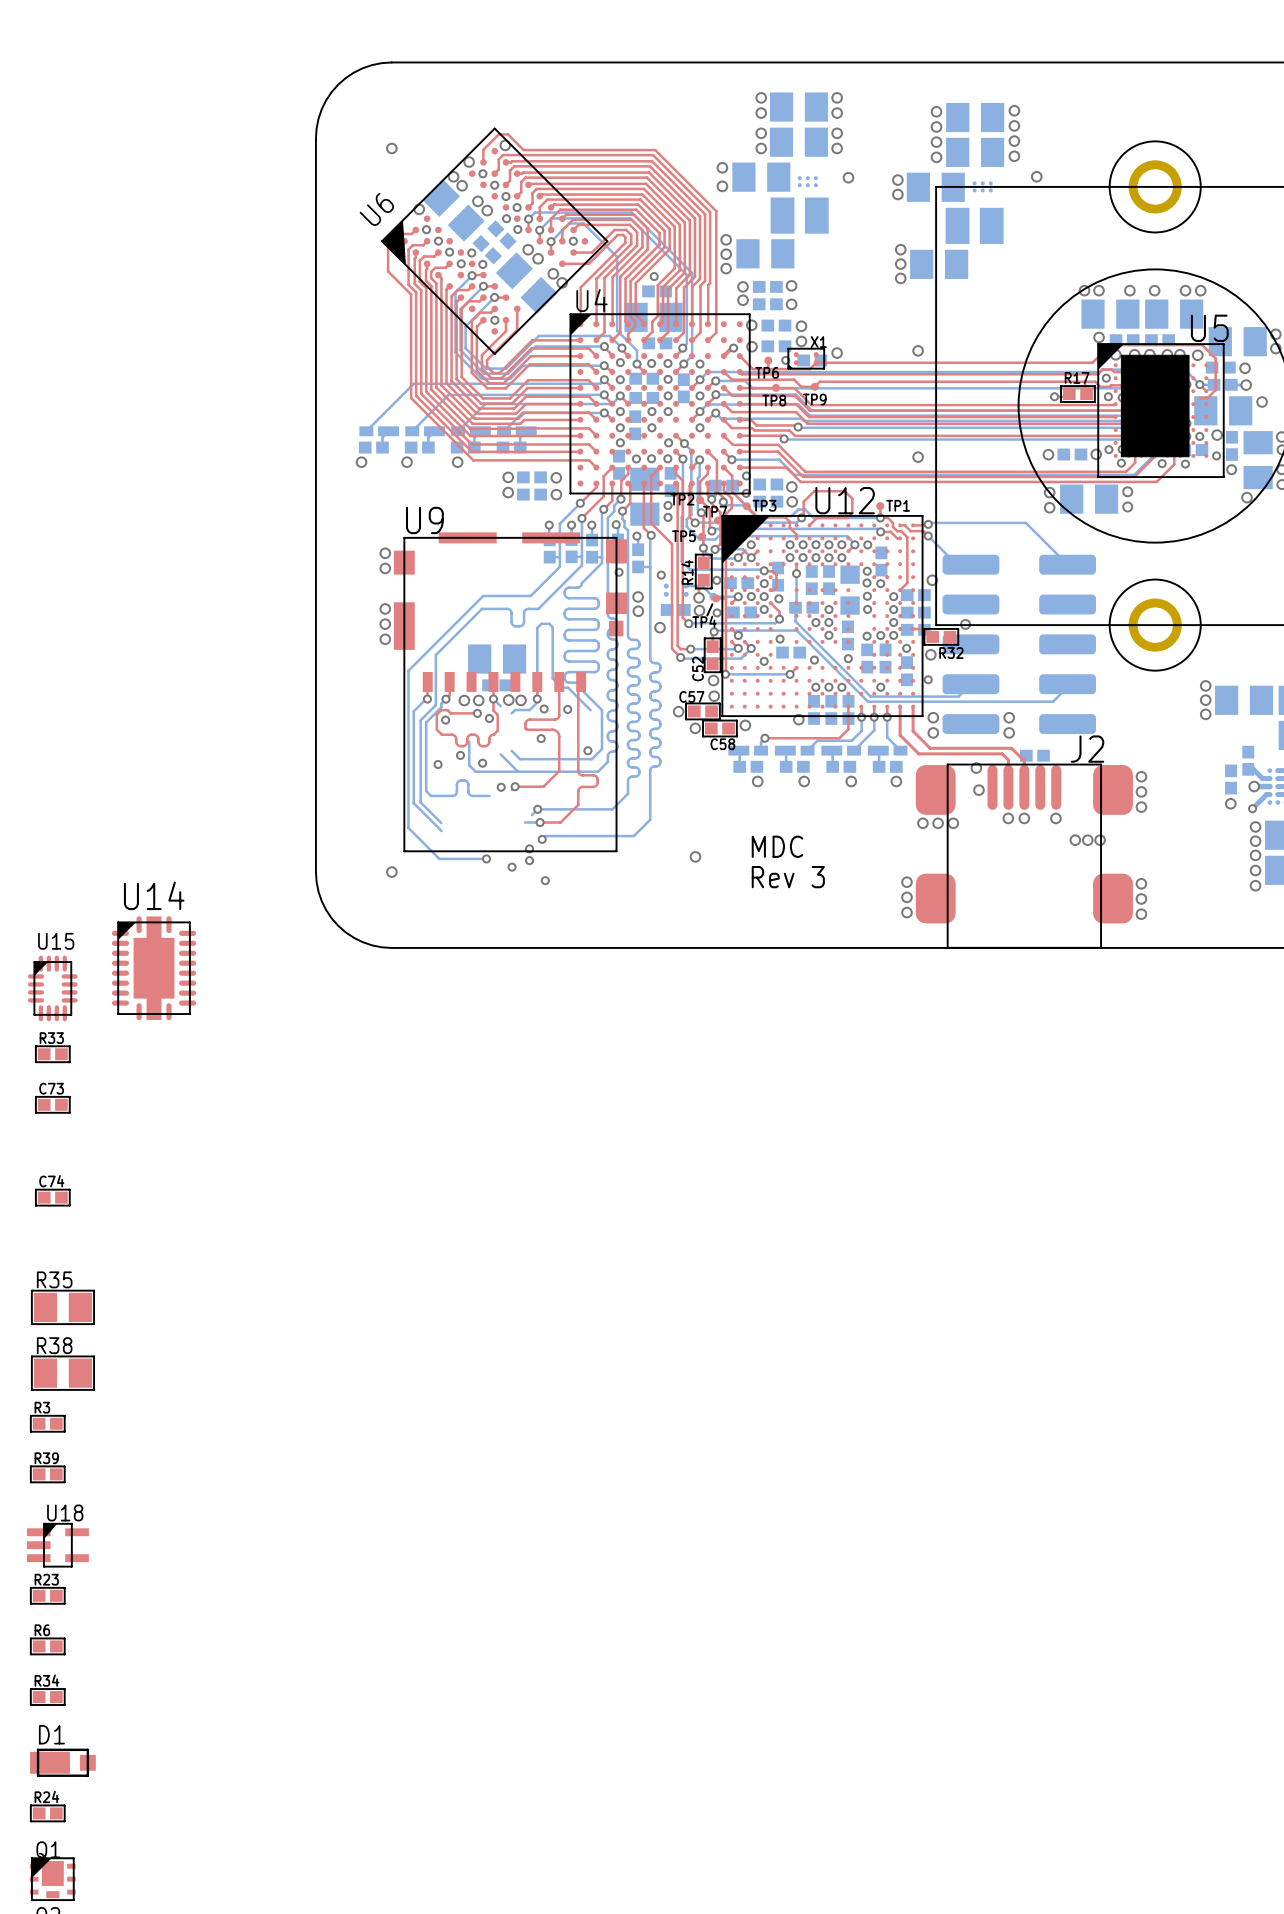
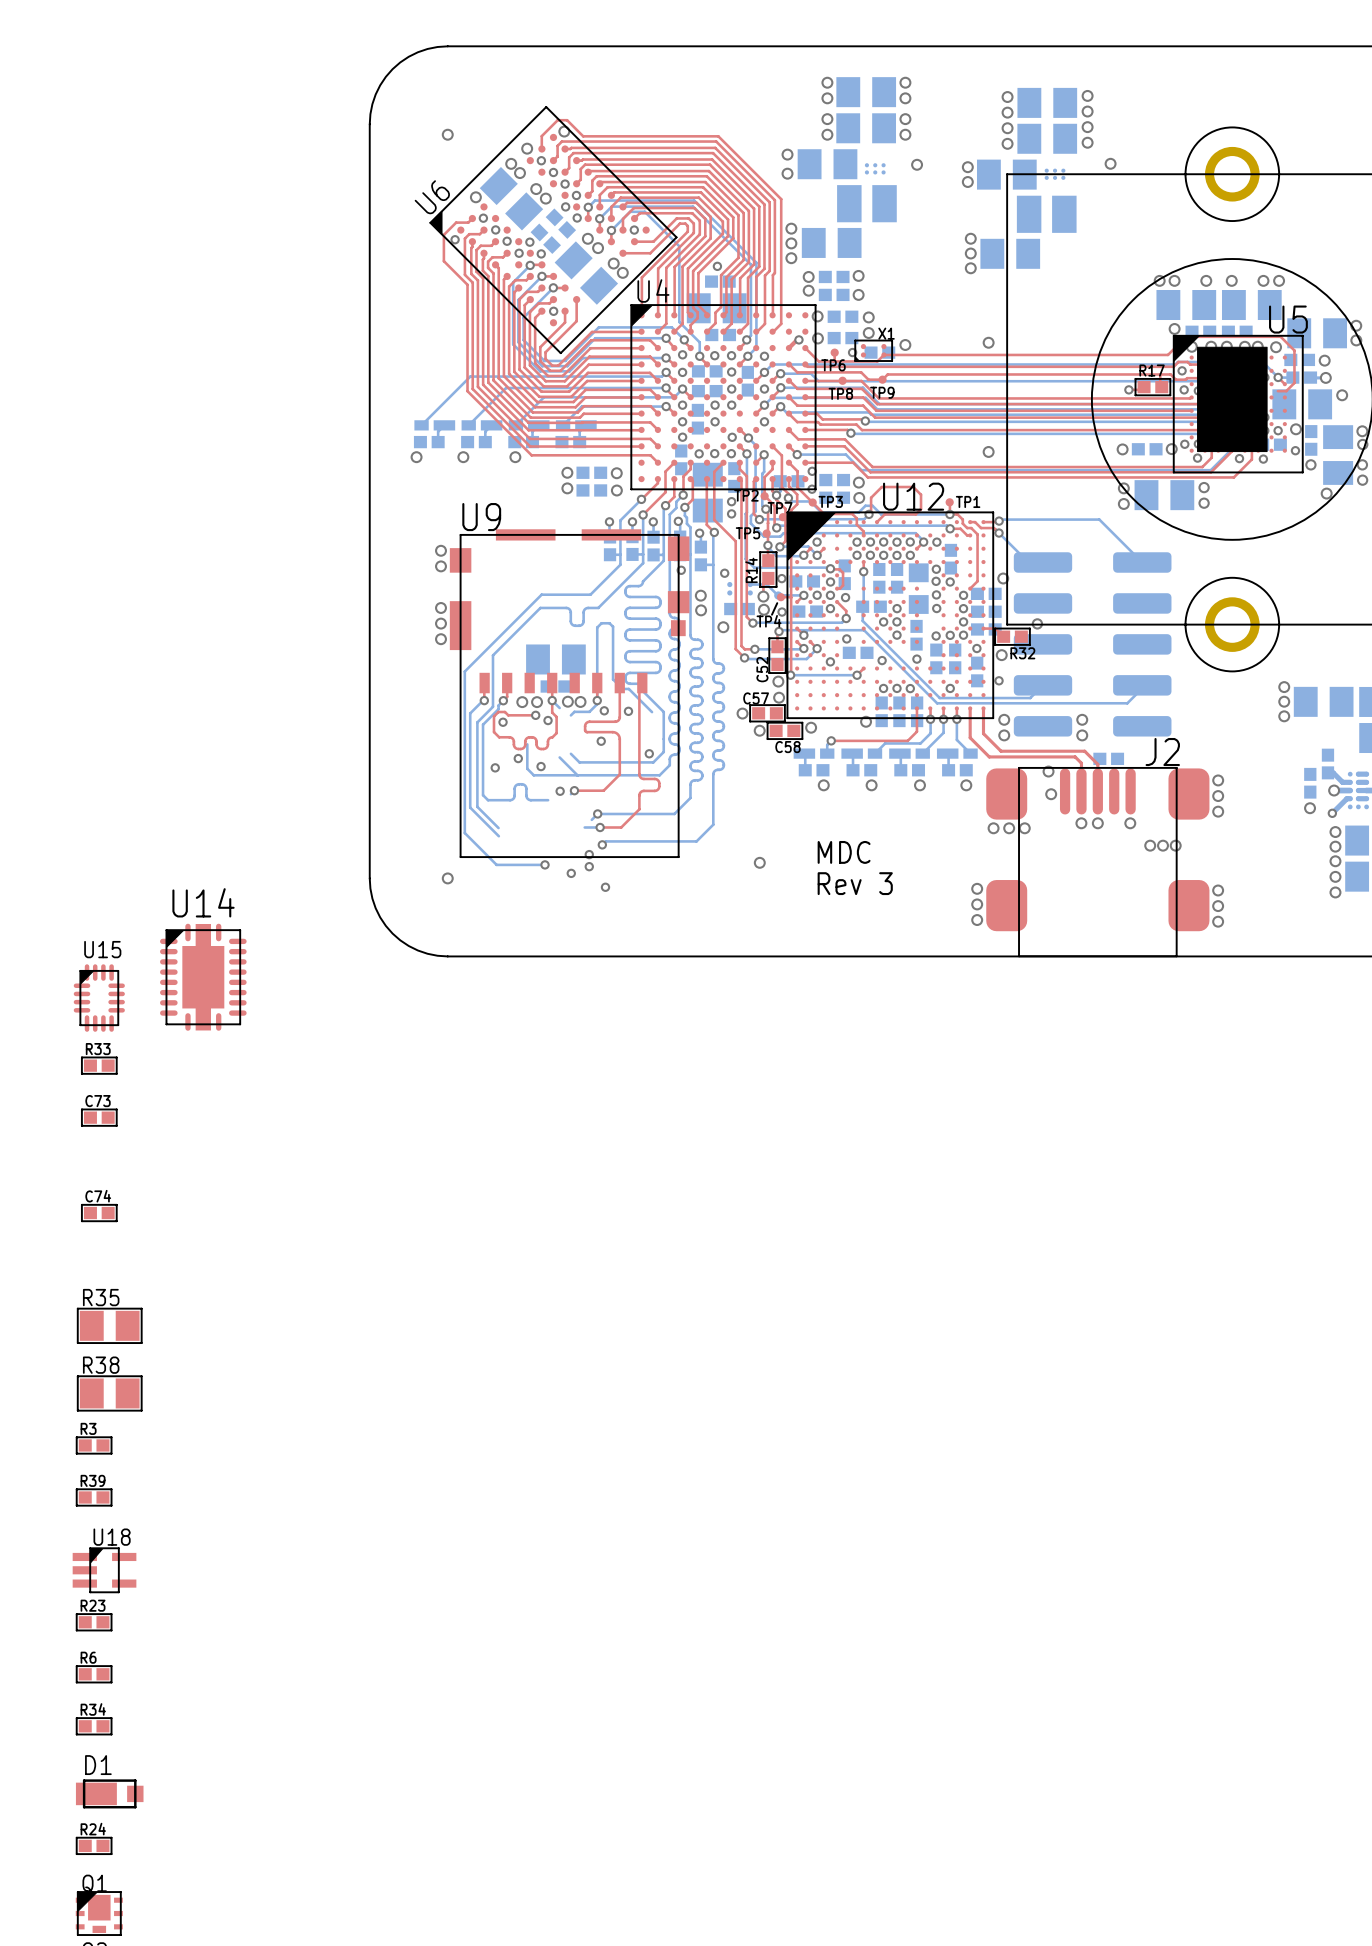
U6 footprint: [381, 128, 608, 355] -> [429, 106, 678, 354]
top track: none -> (530, 299) (524, 305) (524, 367) (543, 386) (567, 386) (588, 364) (641, 364)

